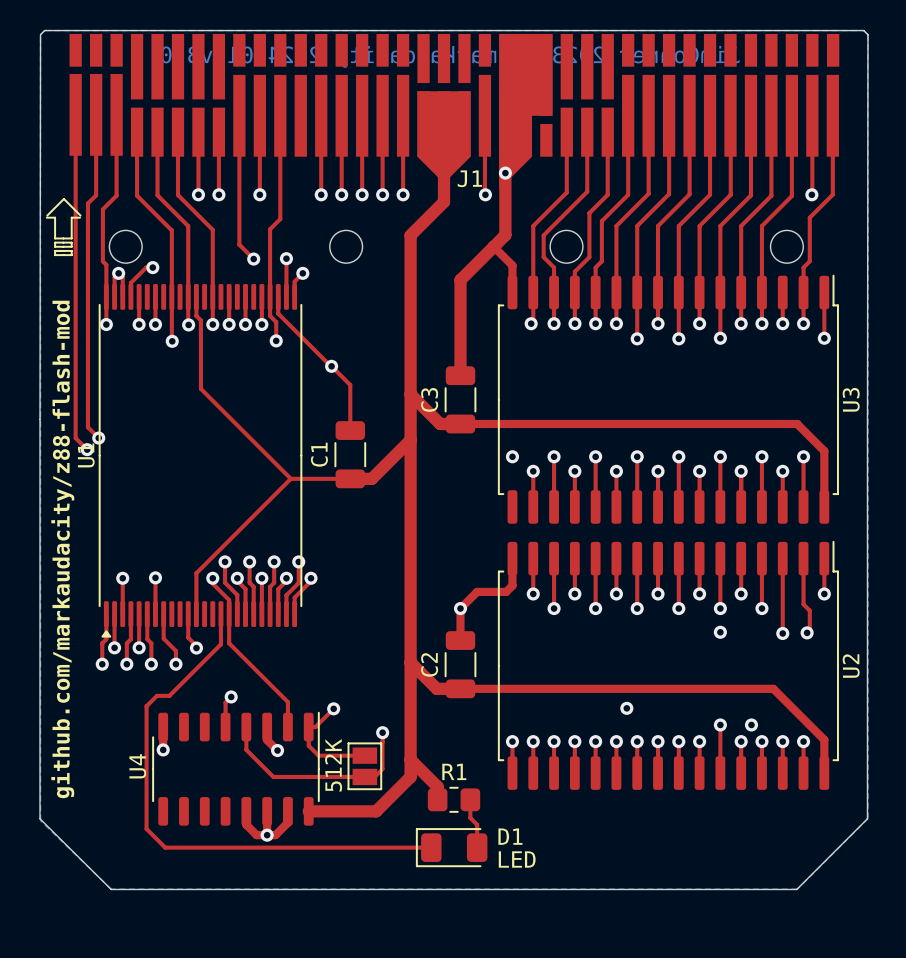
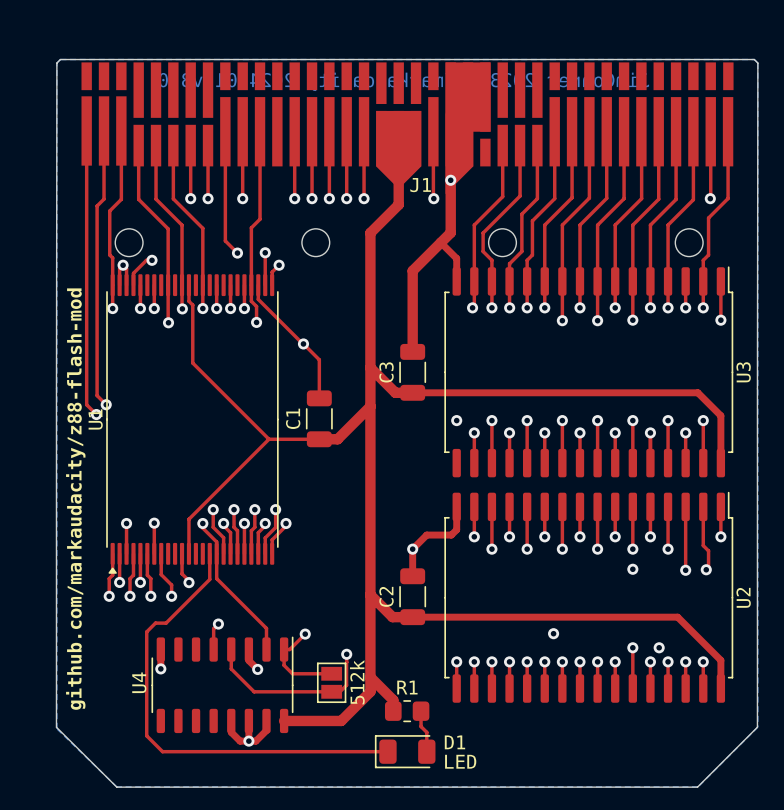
line: (47, 215) (63, 198) (80, 215) -> none
line: (46, 217) (55, 217) (55, 238) (71, 238) (71, 217) (80, 217) -> none
line: (55, 242) (55, 246) (71, 246) (71, 242) (55, 242) -> none
line: (55, 250) (55, 255) (71, 255) (71, 250) (55, 250) -> none
512K name: 512K (333, 765) -> none
512K value: none -> 512k (357, 682)

